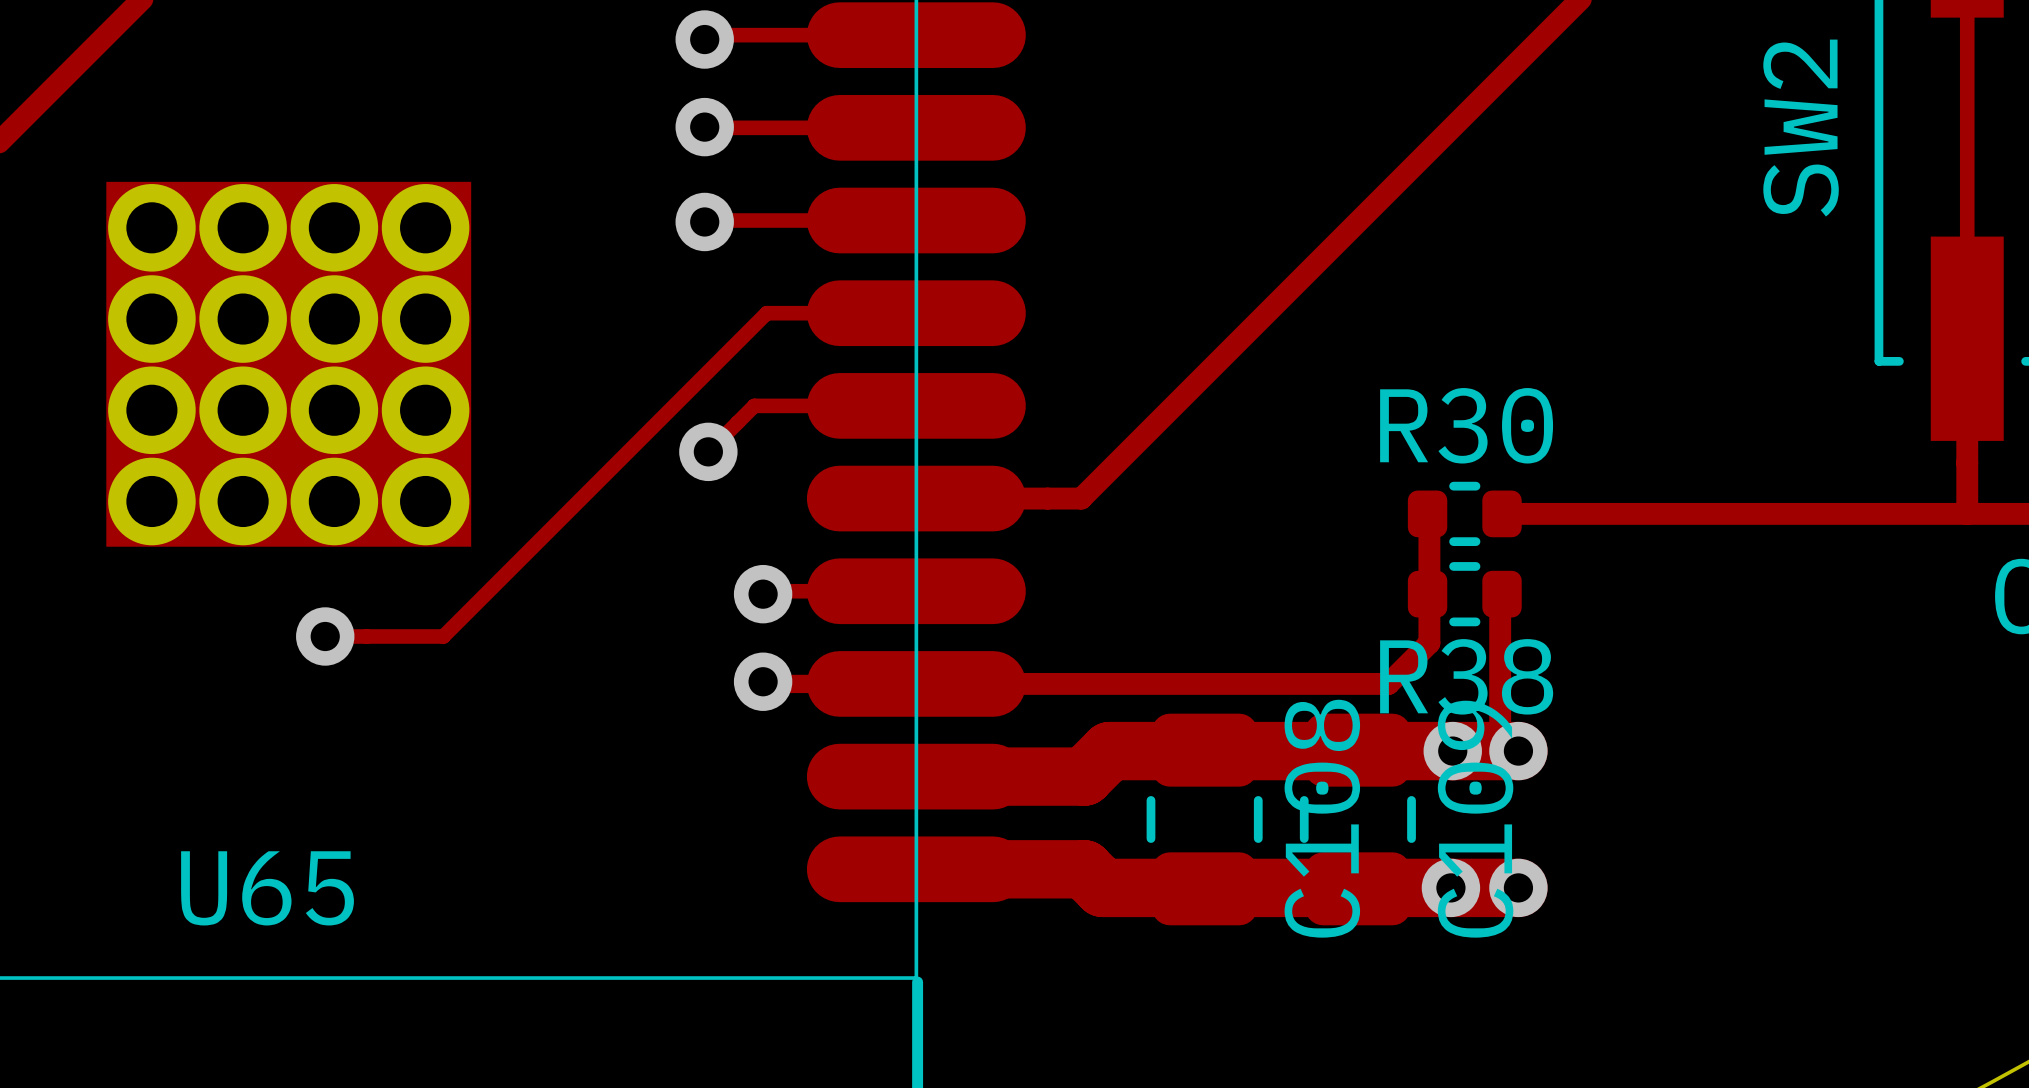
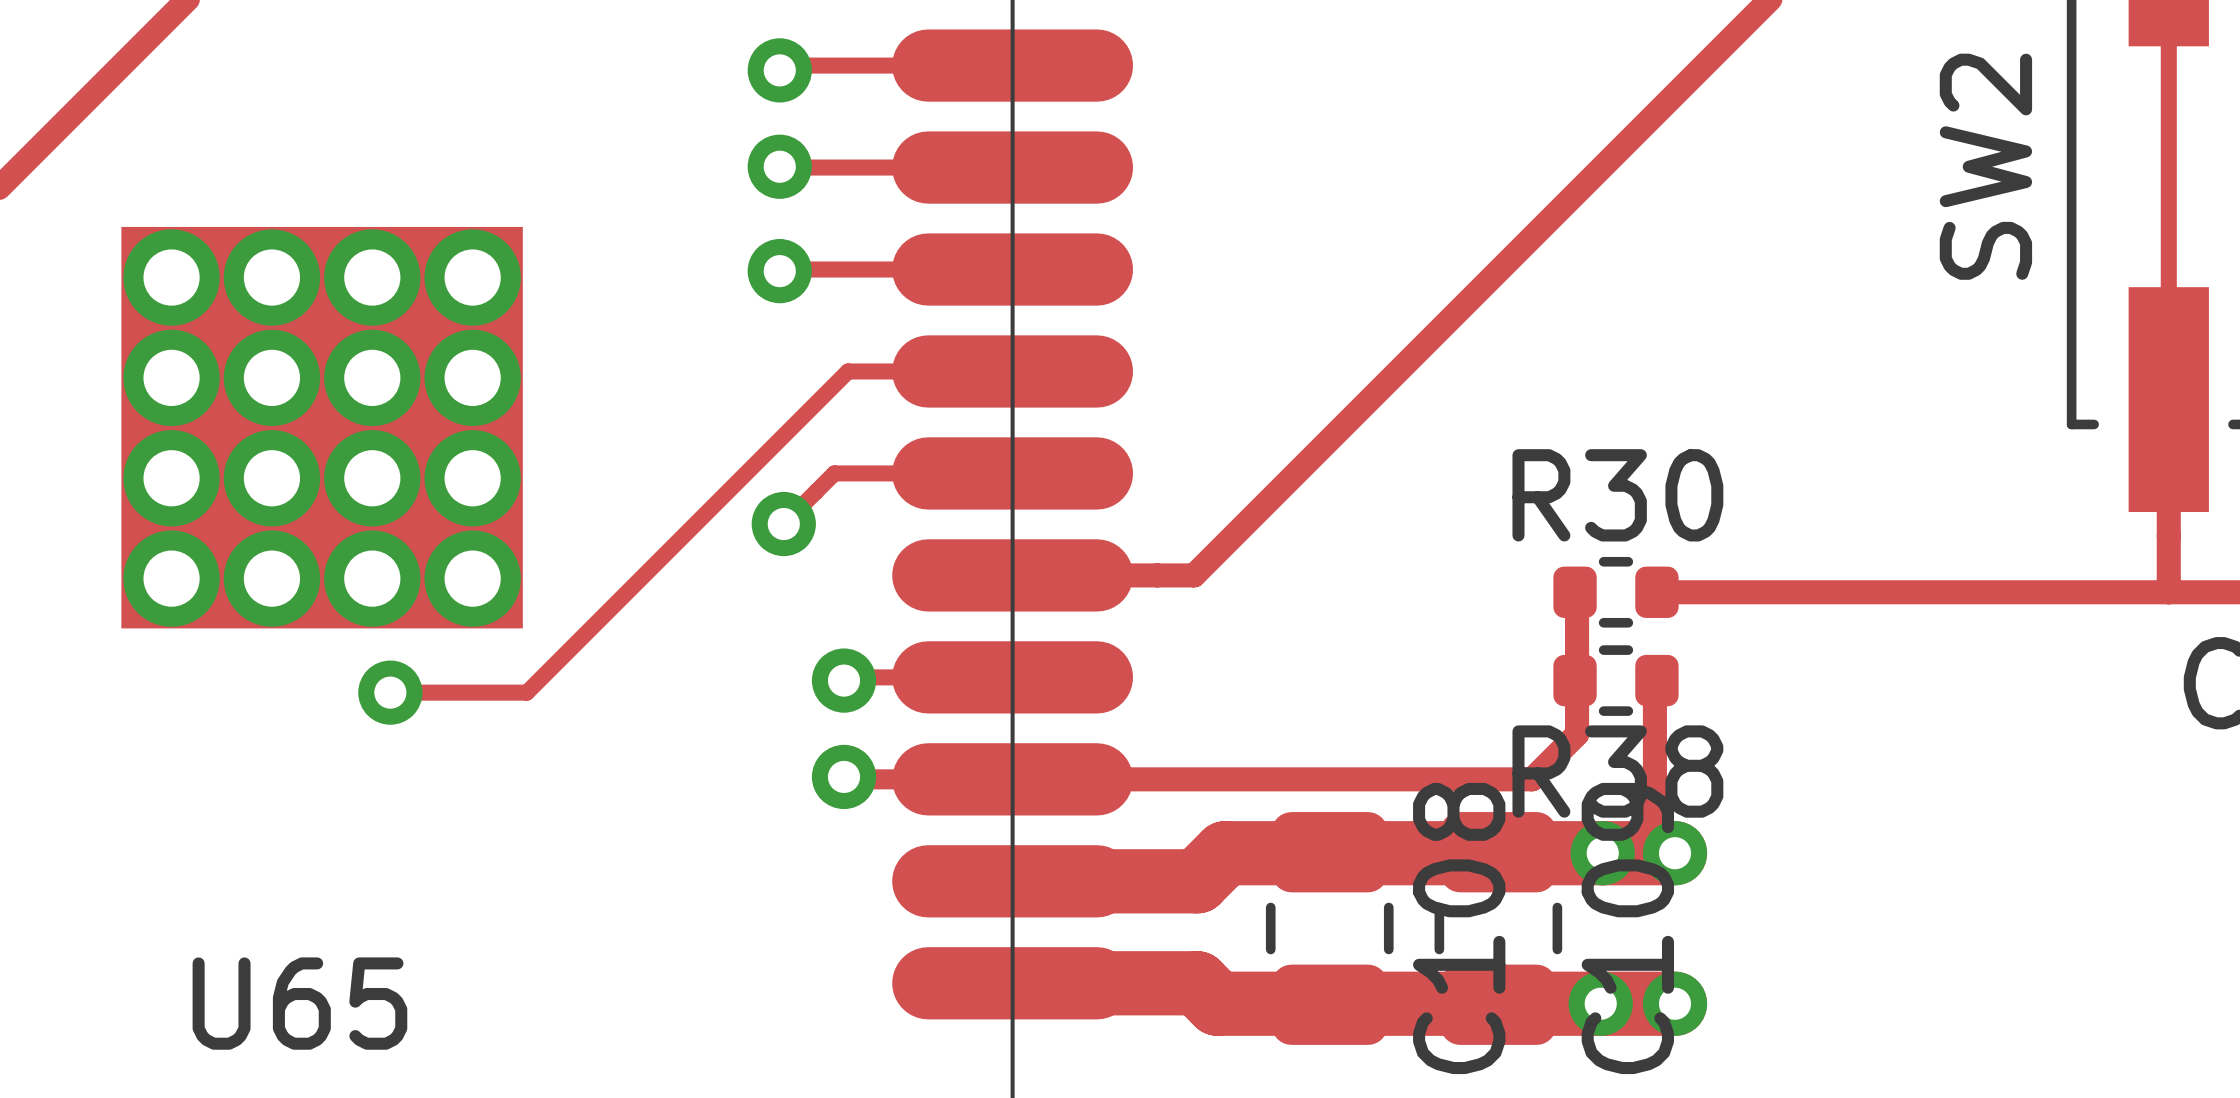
track: (474, 605) (443, 636) (325, 636) -> (526, 692) (390, 692)
via position: (325, 636) -> (390, 692)

